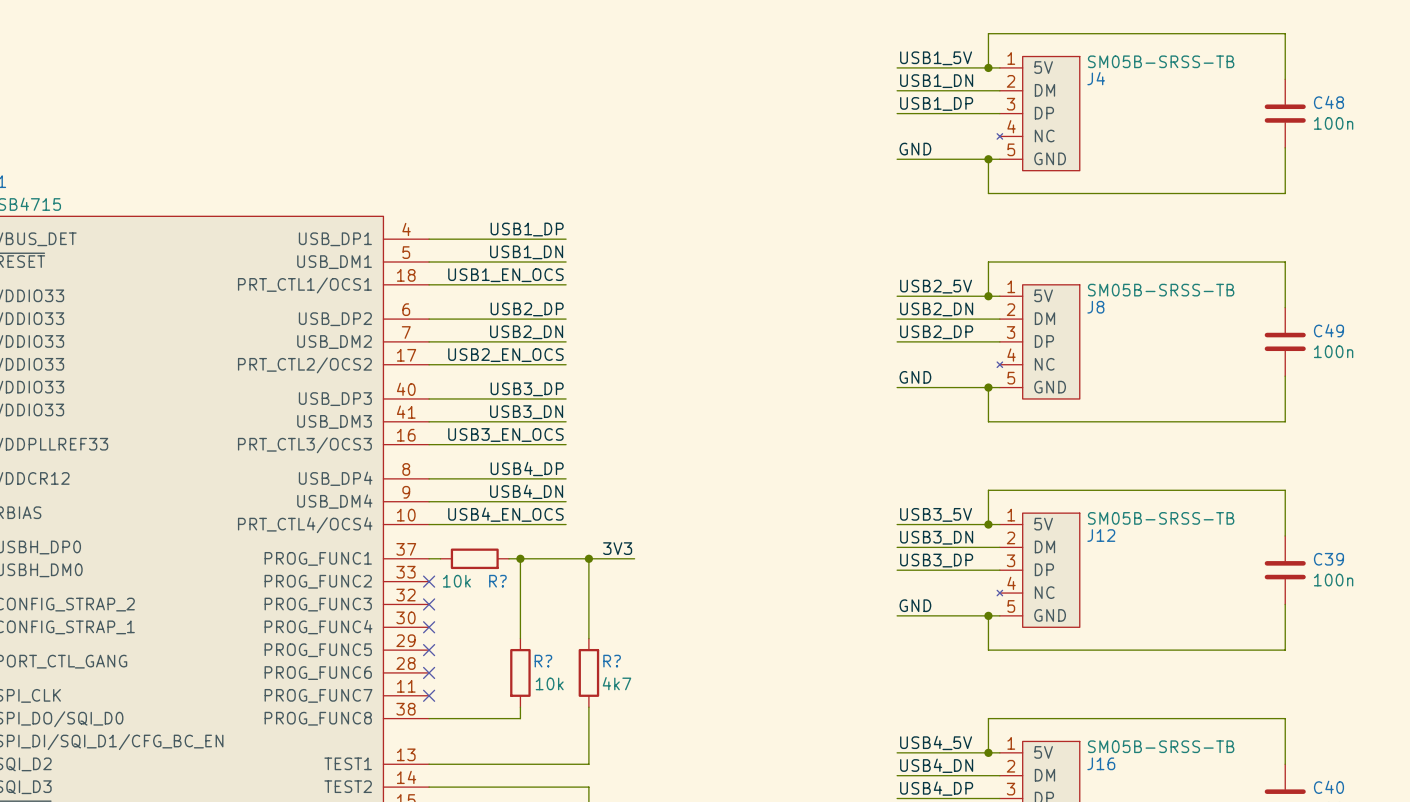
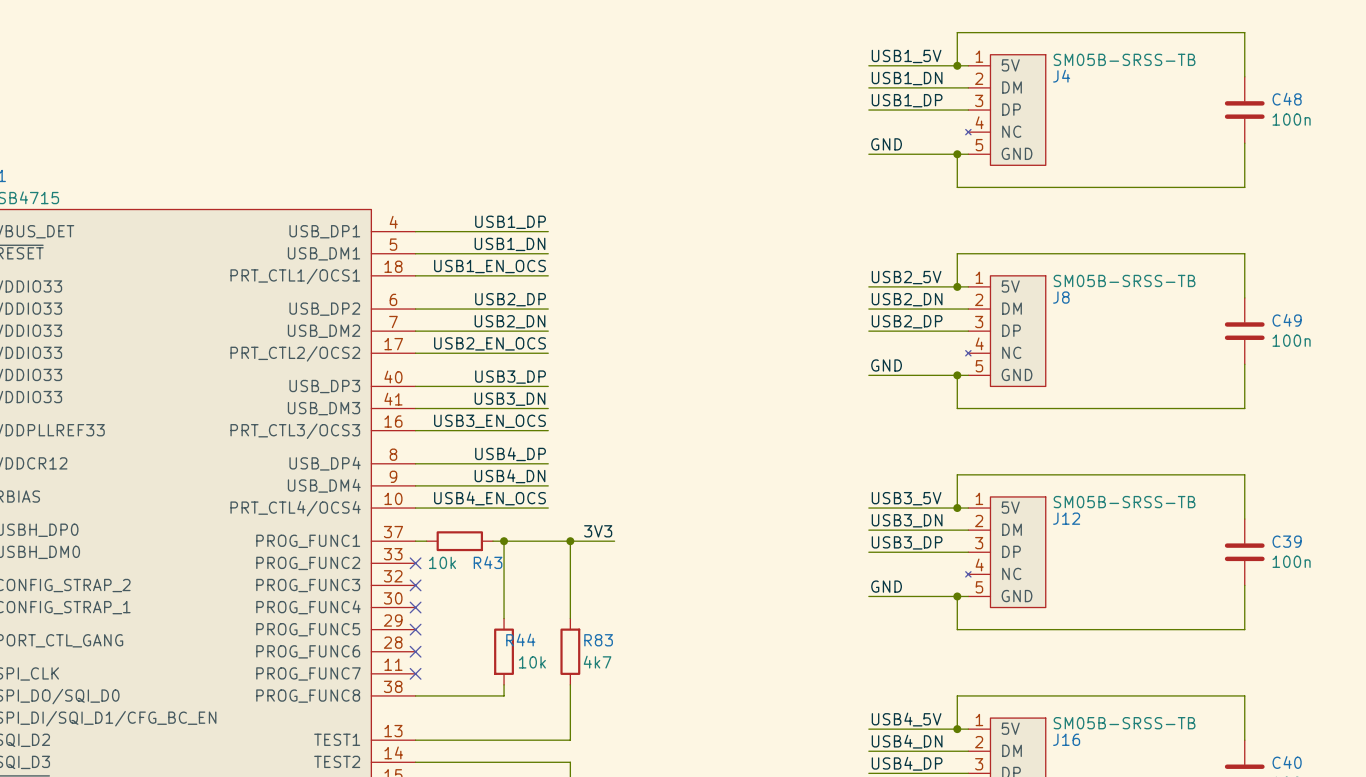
R? name: R? (497, 581) -> R43 (488, 562)
R? name: R? (543, 661) -> R44 (520, 640)
R? name: R? (612, 661) -> R83 (598, 640)

